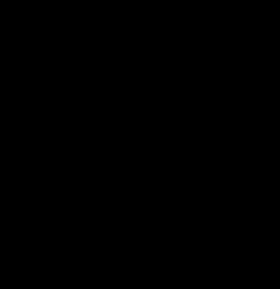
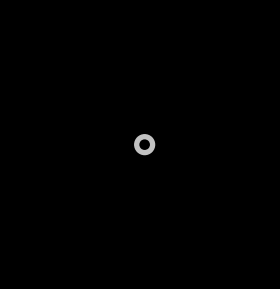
via: none -> (144, 144)

